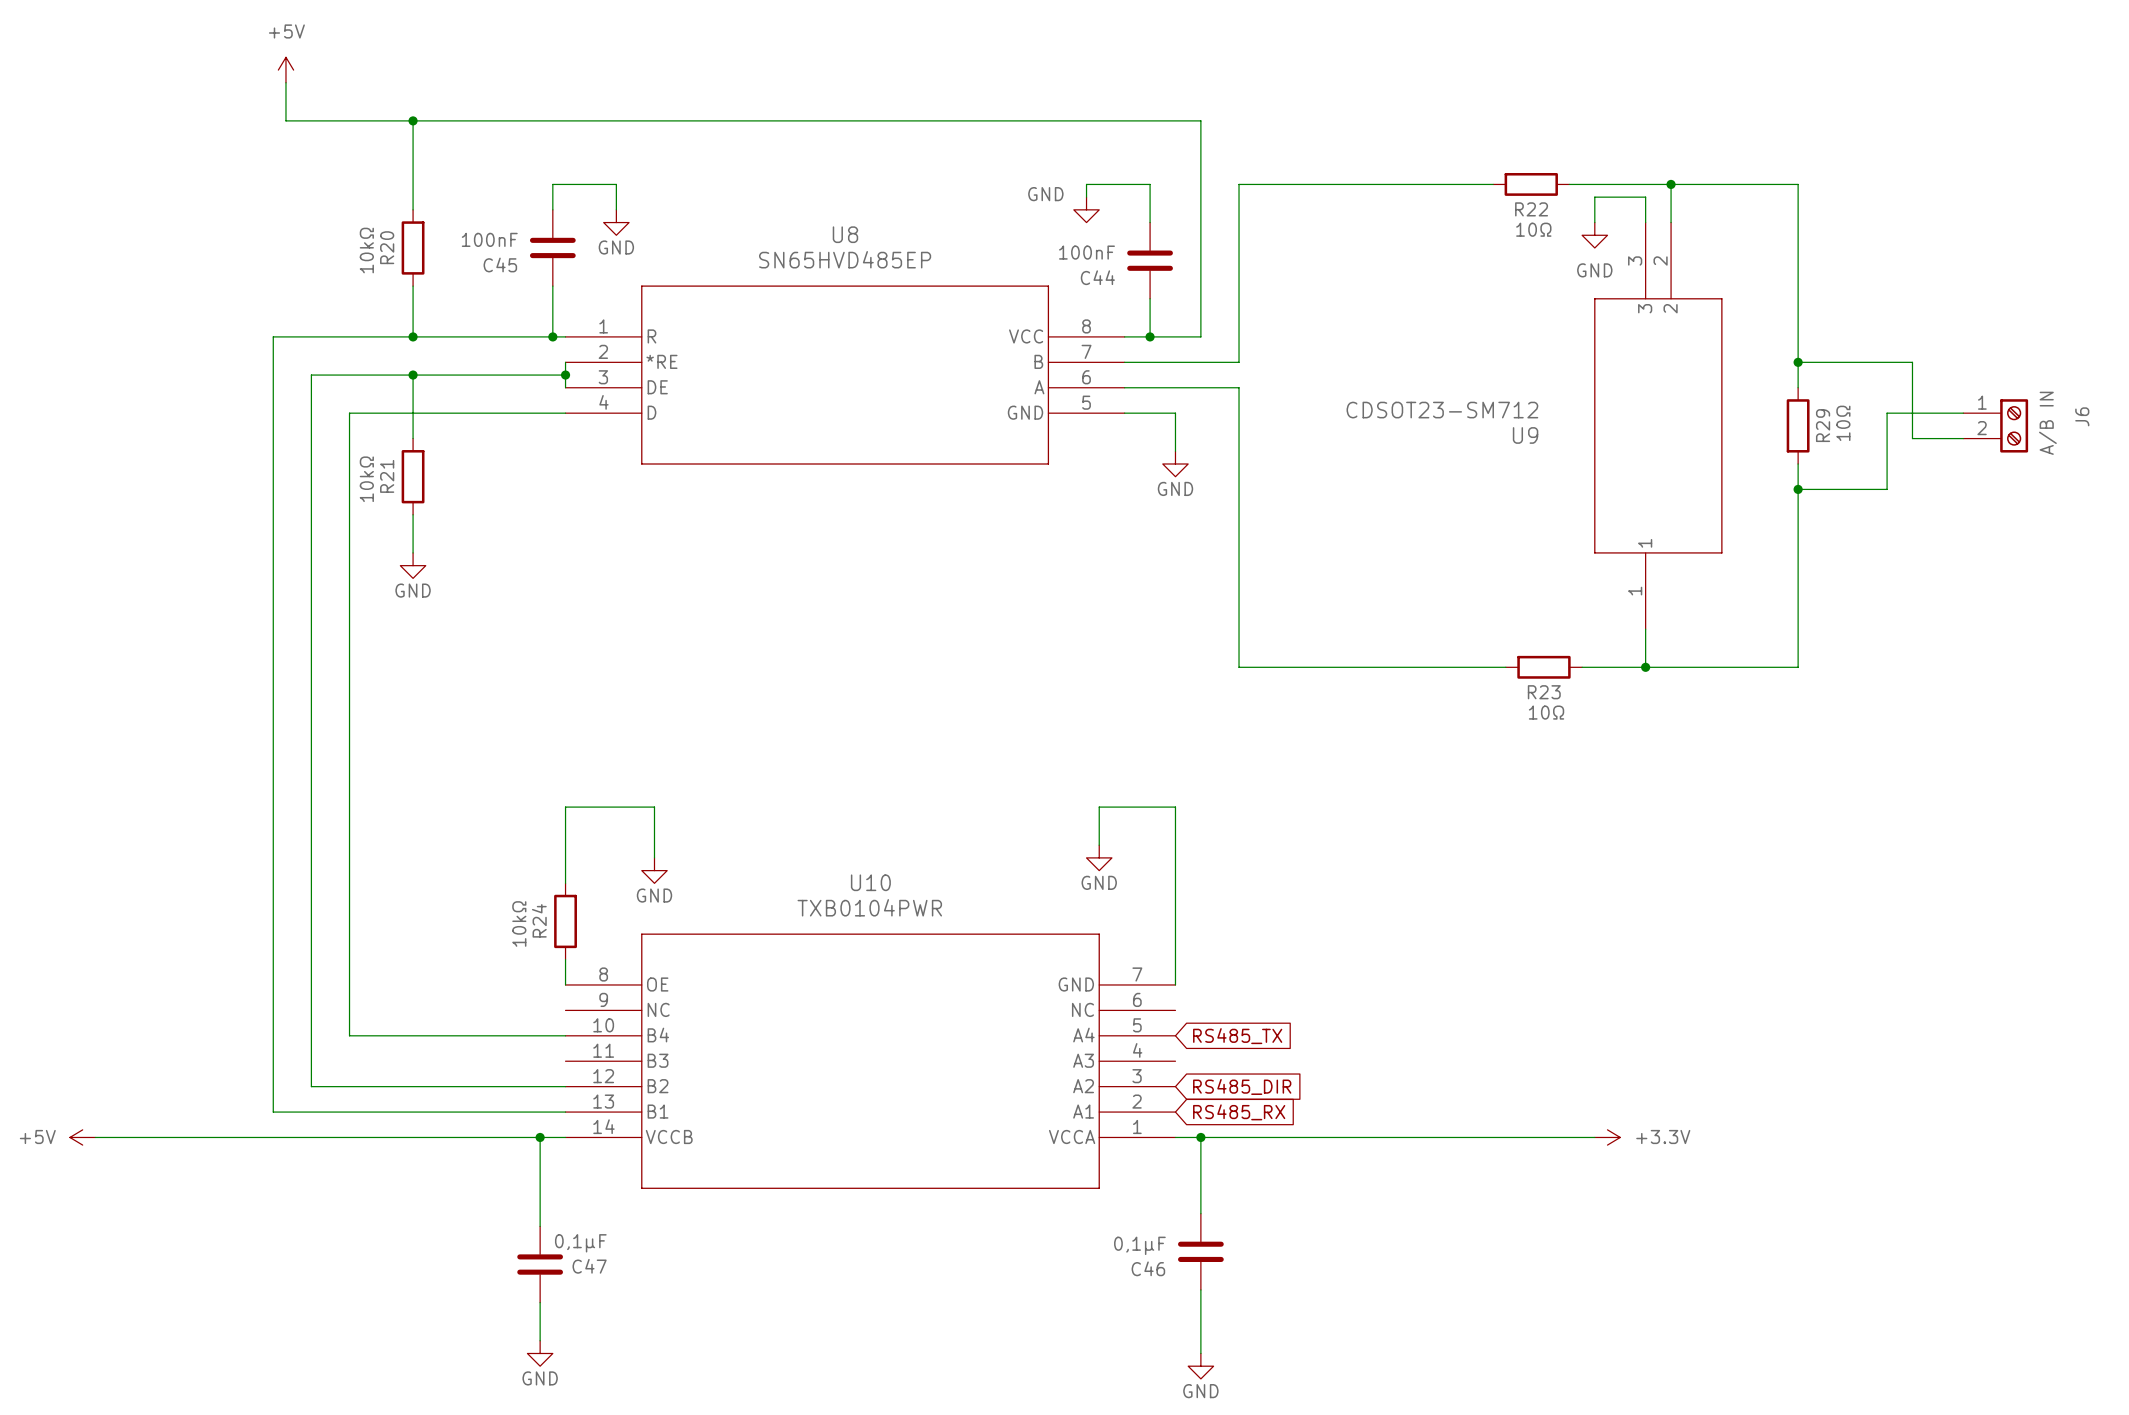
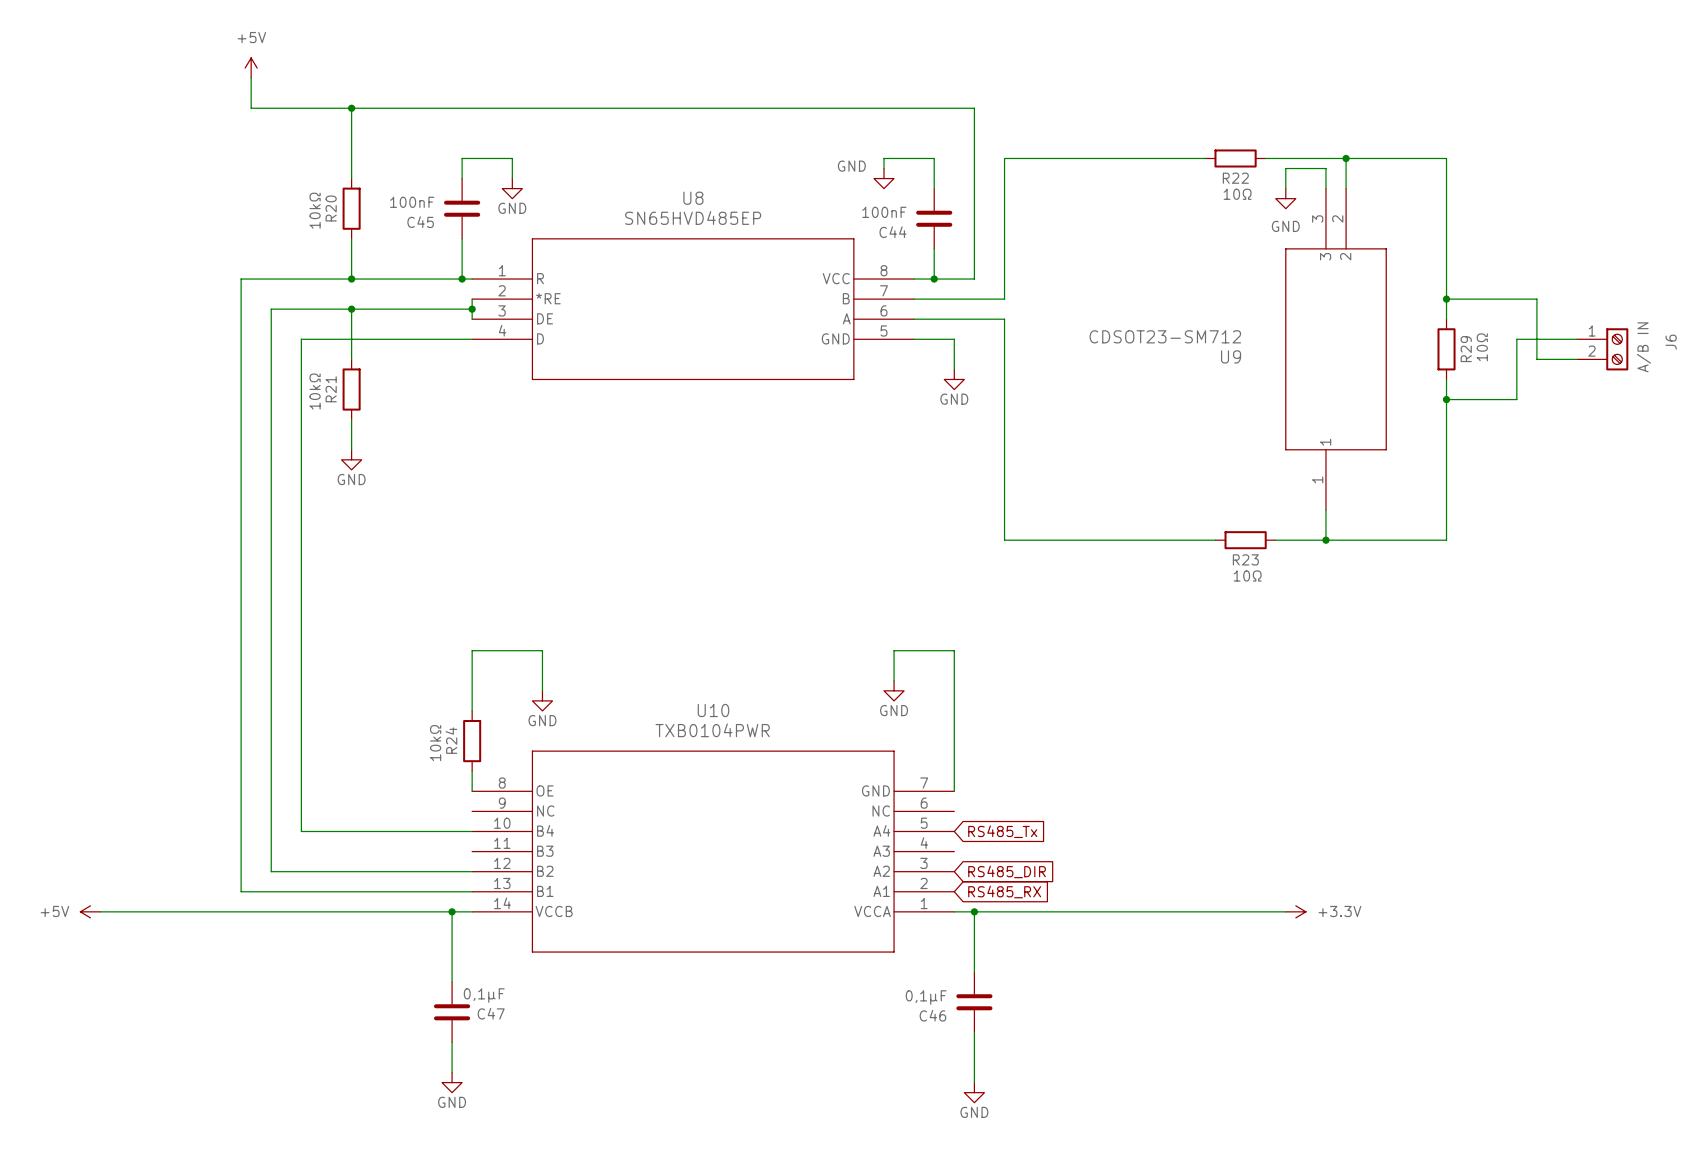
global label: RS485_TX (1237, 1036) -> RS485_Tx (1002, 831)

